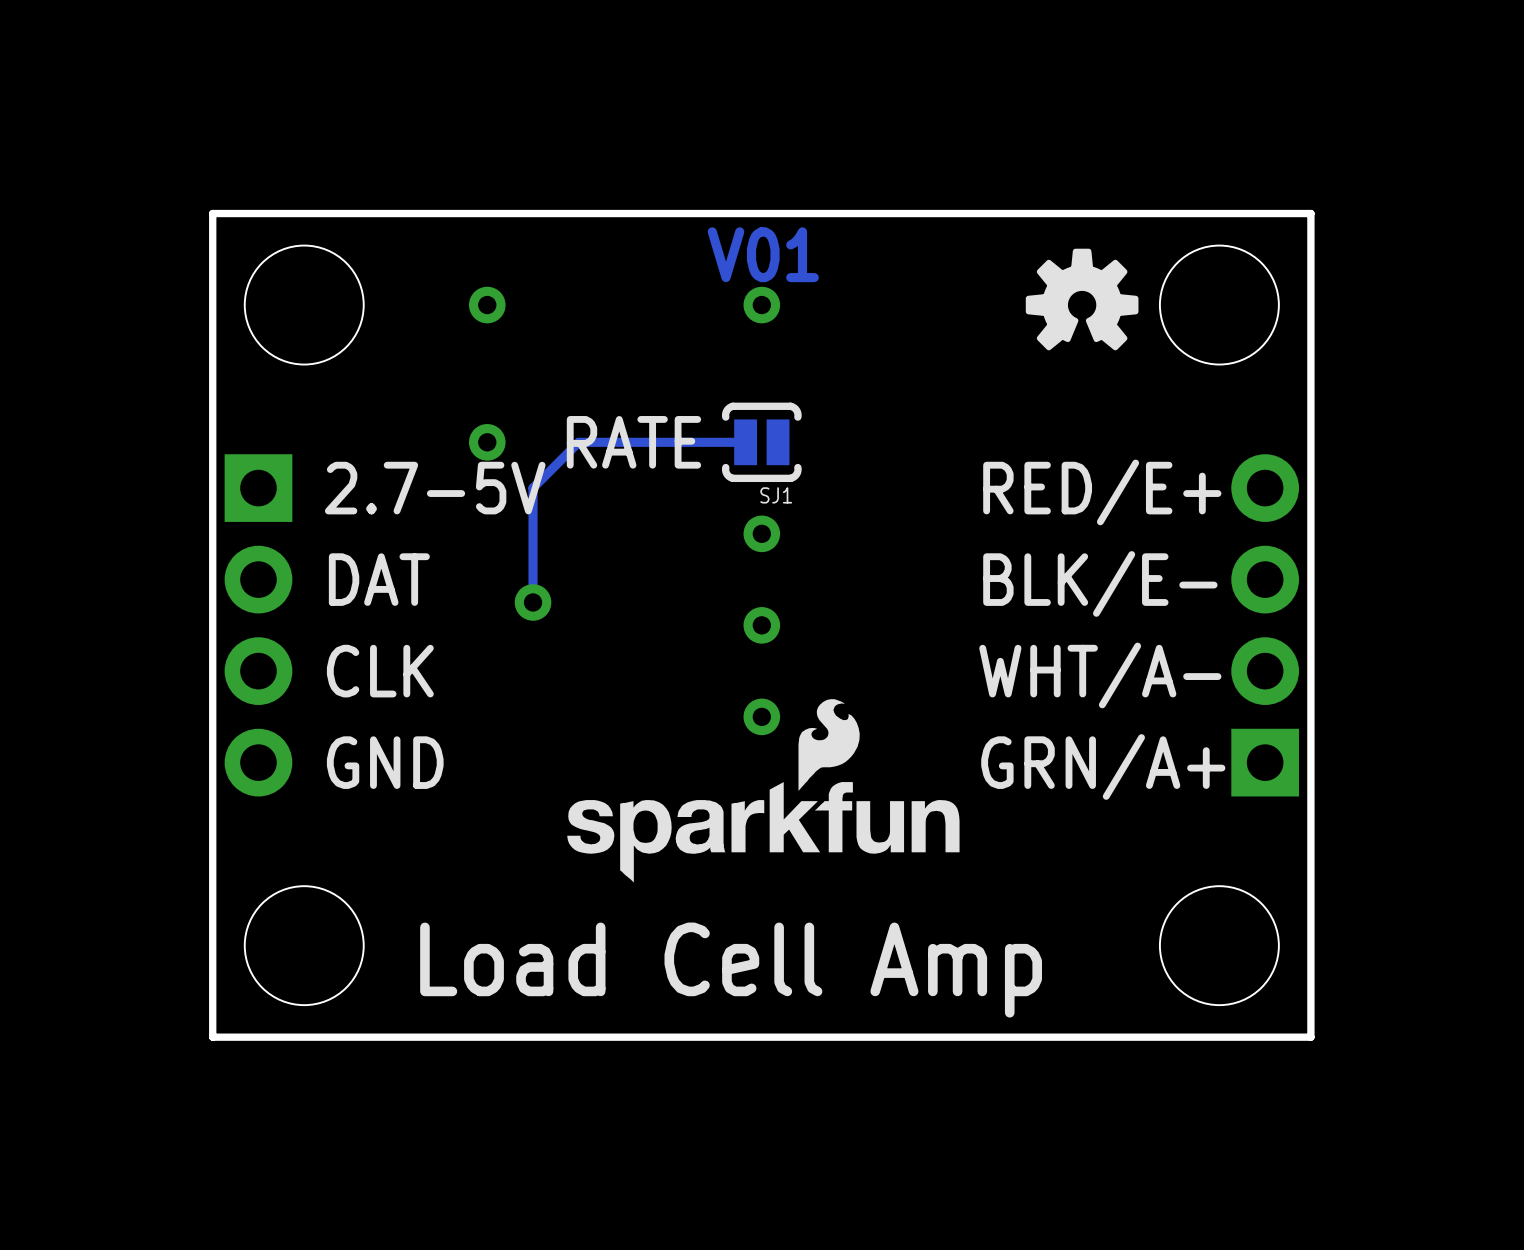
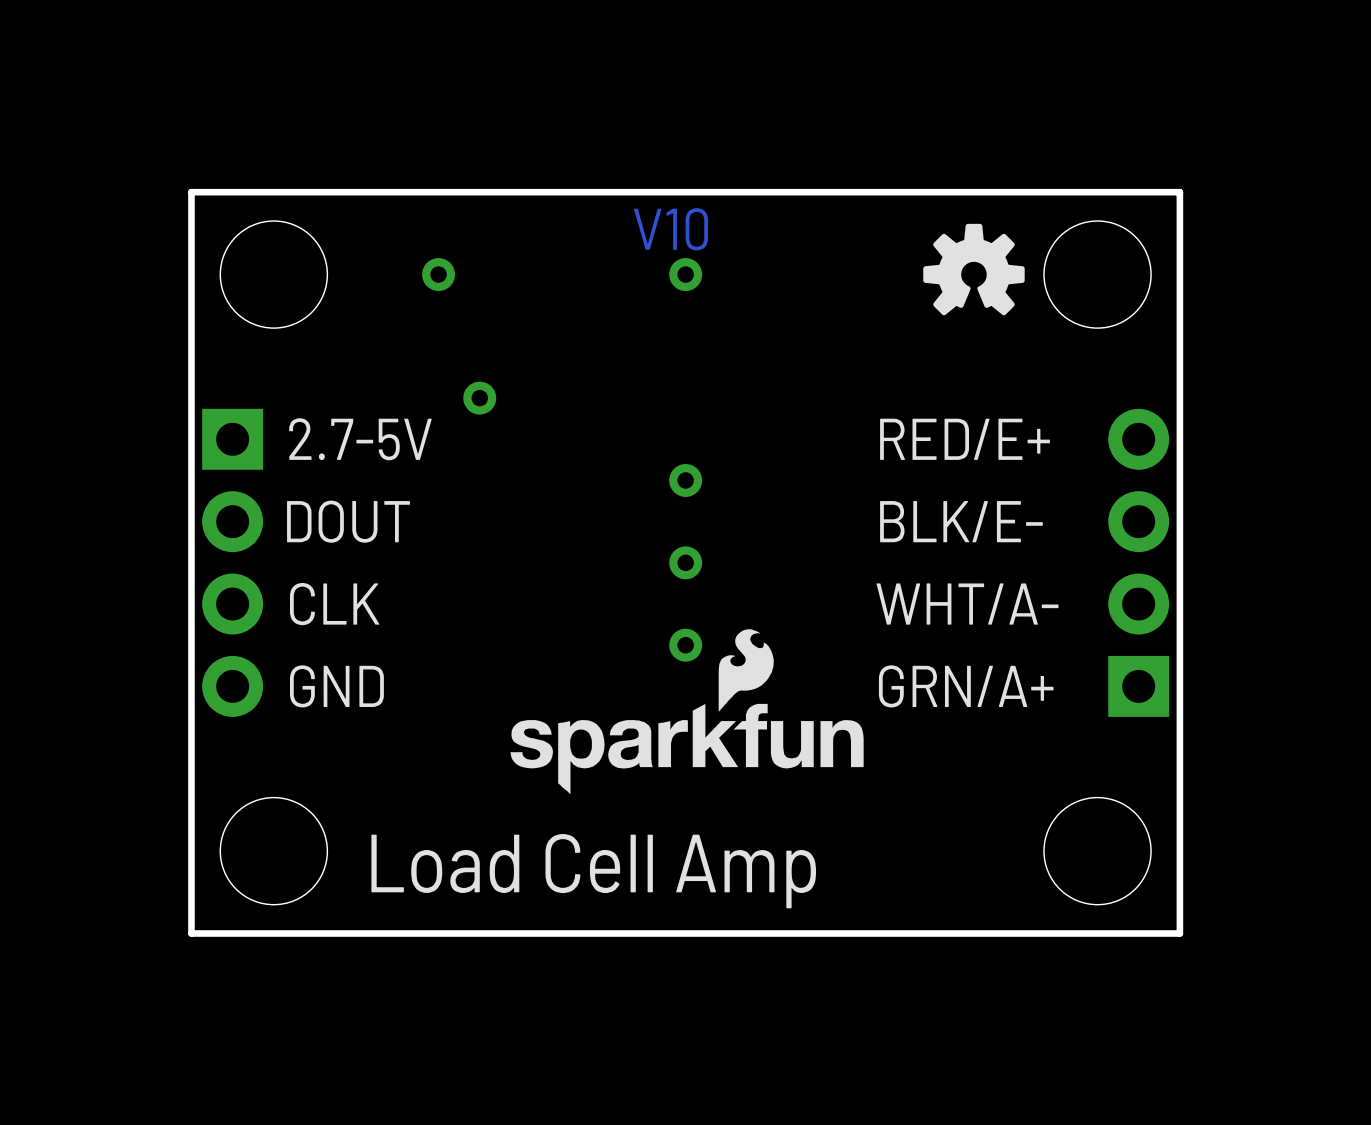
text: V01 (763, 254) -> V10 (671, 229)
via position: (487, 442) -> (479, 398)
text: RATE (633, 442) -> none
track: (745, 442) (578, 442) (533, 488) (533, 602) -> none
SJ1: (761, 442) -> none
text: DAT (379, 579) -> DOUT (348, 521)
via: (533, 602) -> none

